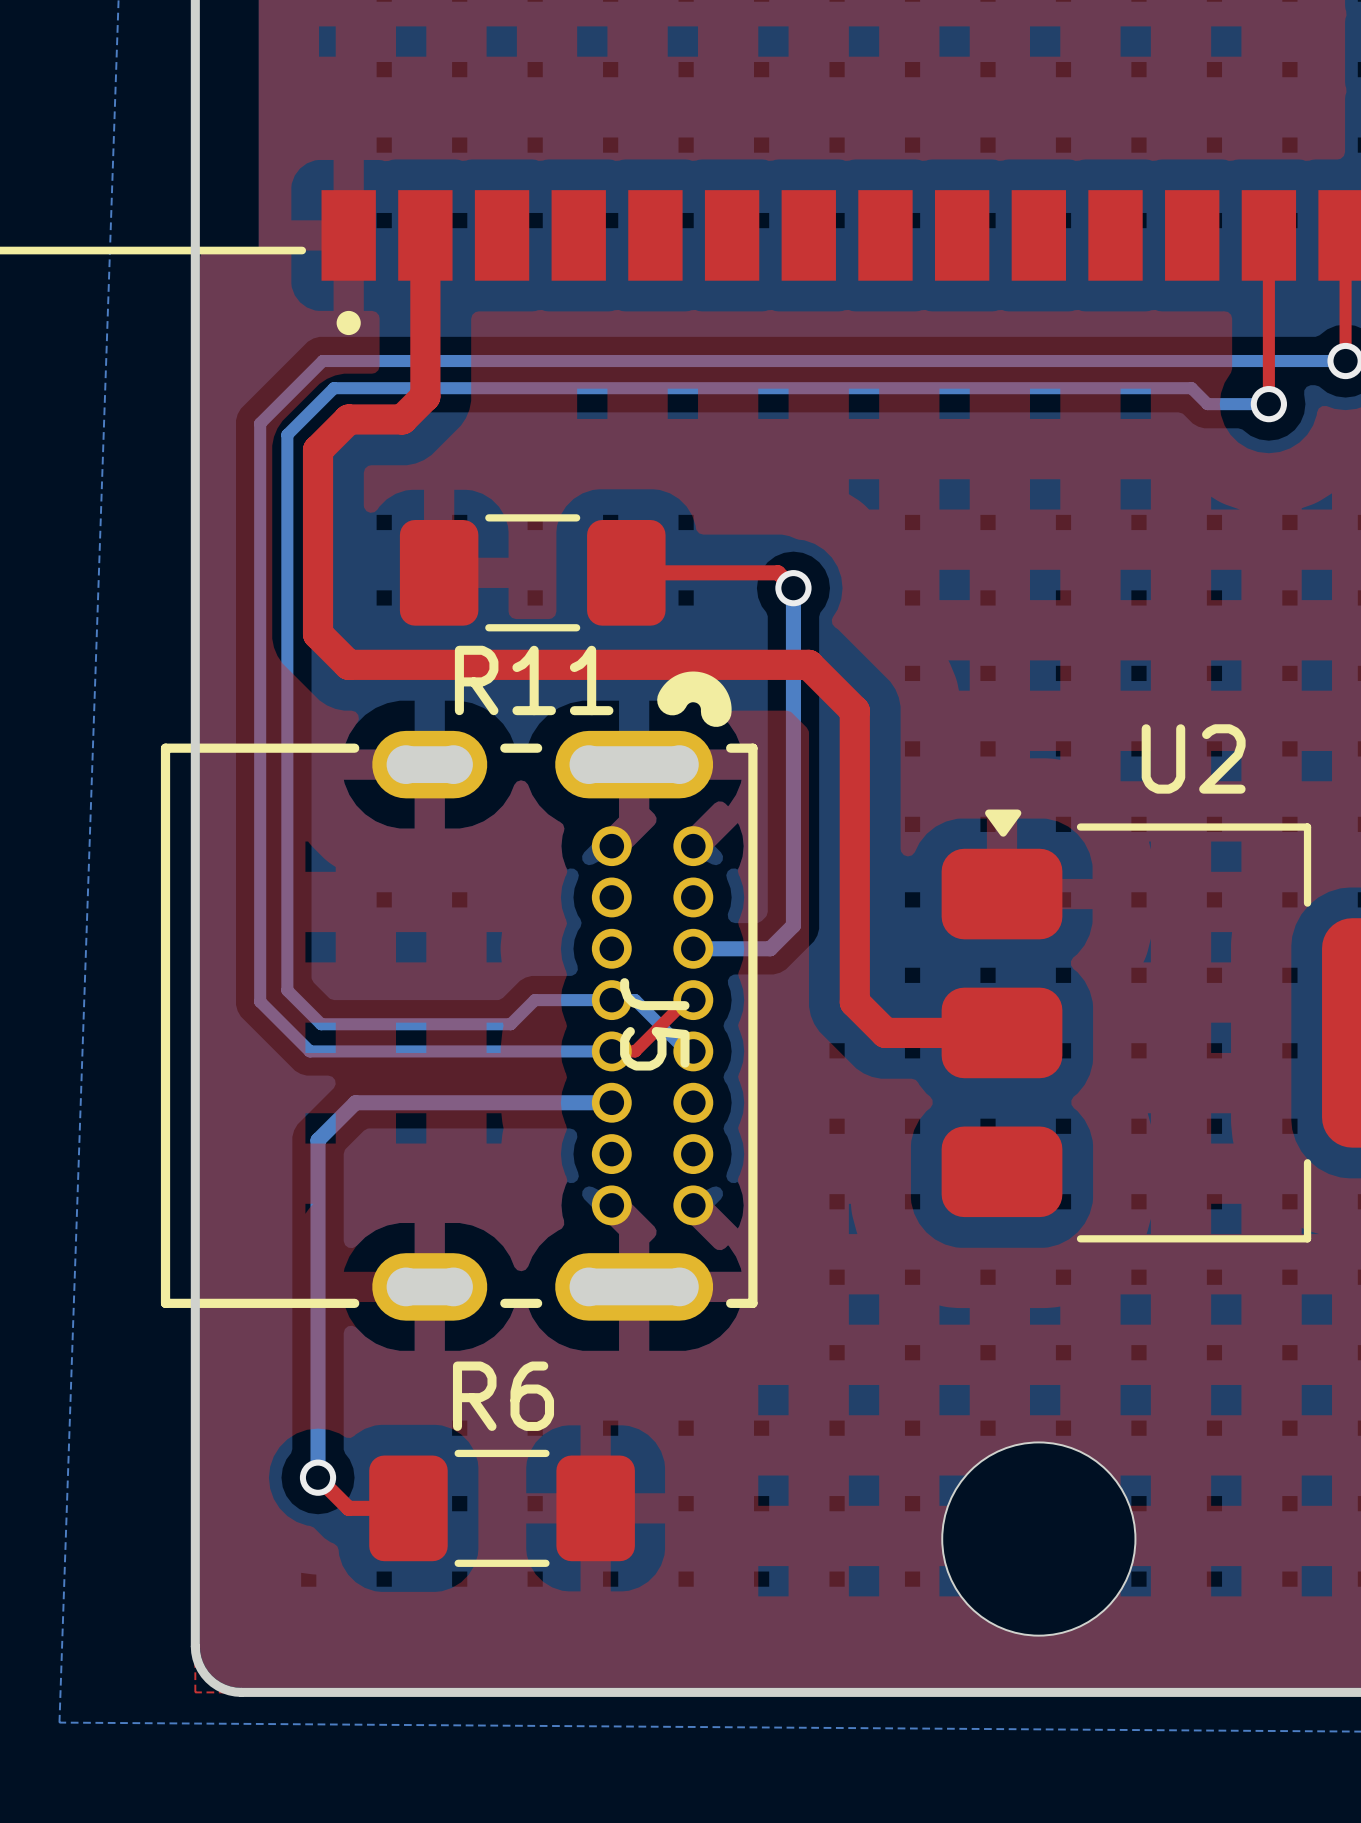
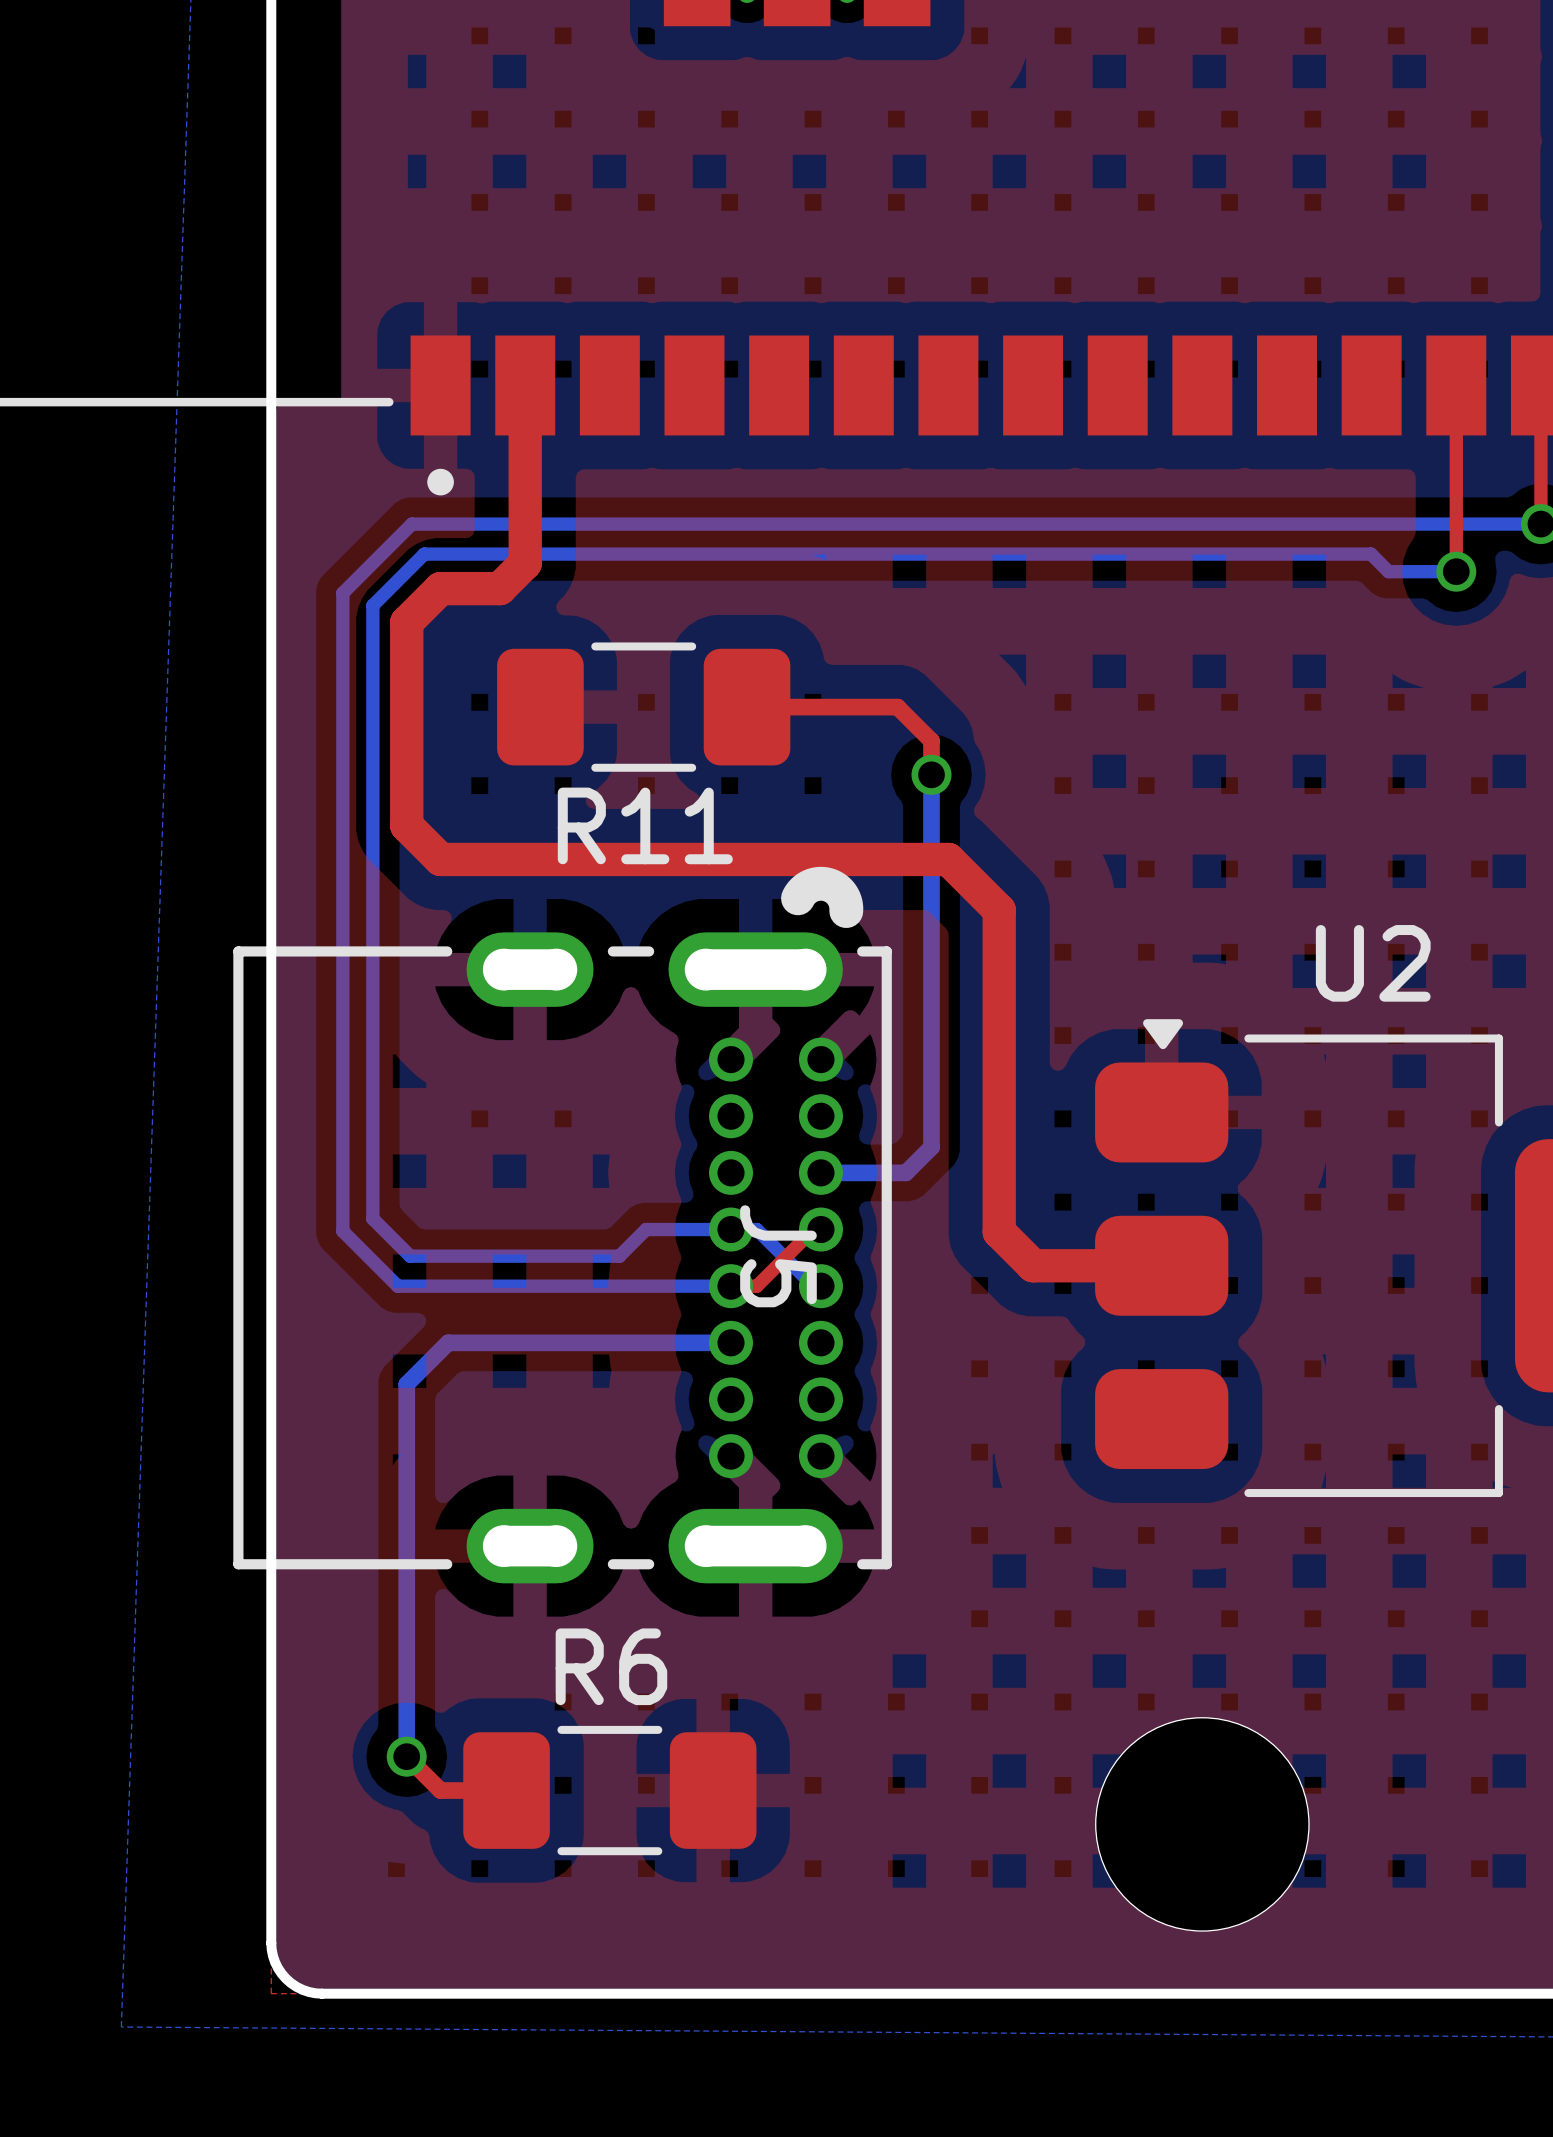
R11 position: (532, 572) -> (643, 707)
top track: (626, 572) (778, 572) (793, 588) -> (747, 707) (897, 707) (931, 740) (931, 774)

